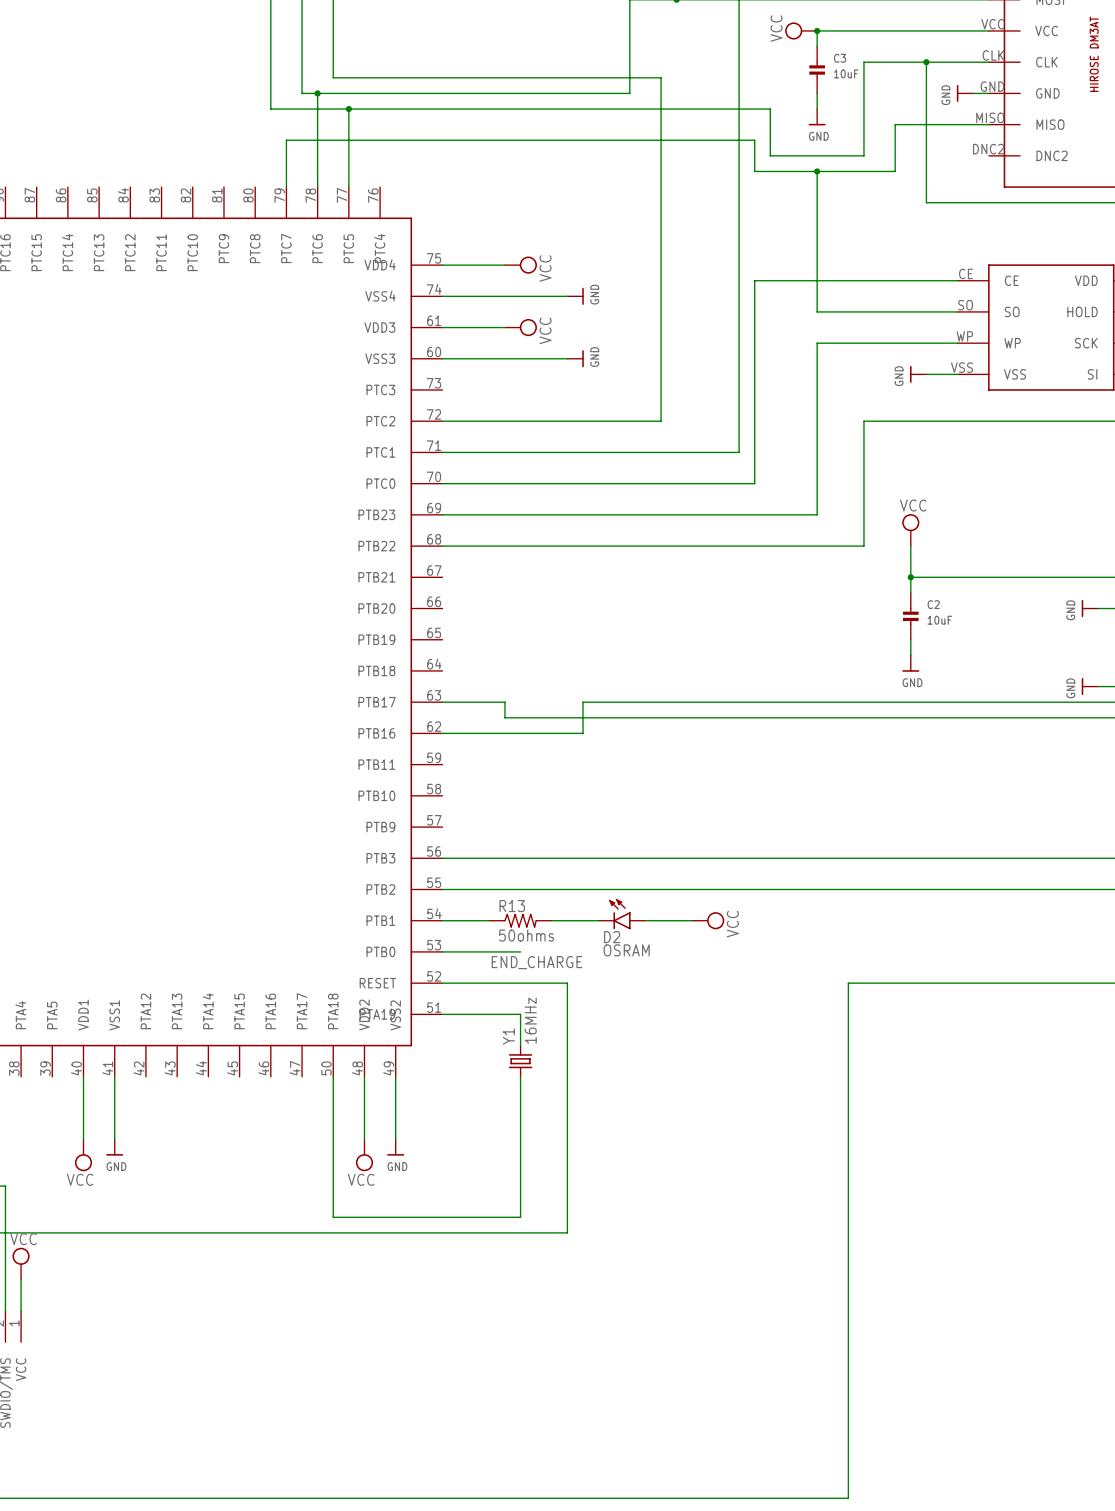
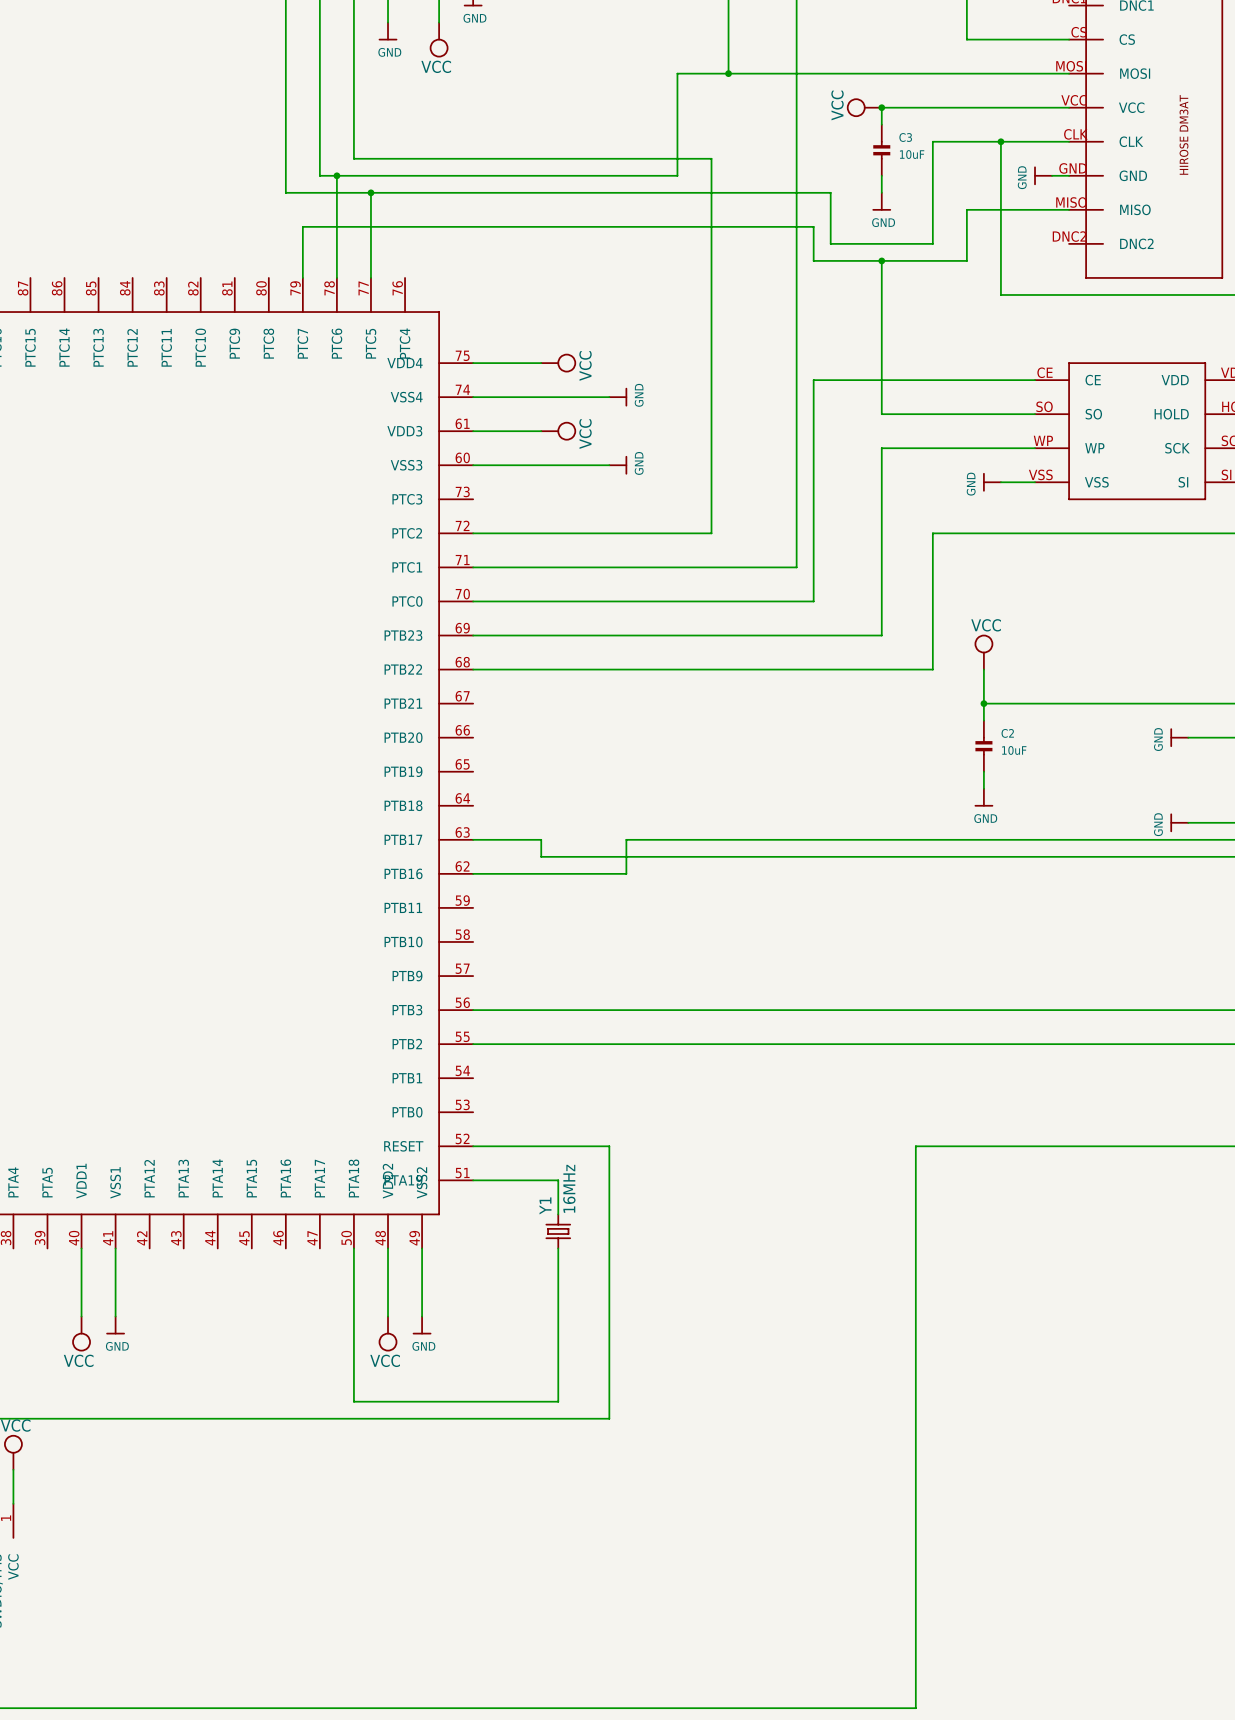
D2: OSRAM (622, 914) -> none
wire: (442, 920) (489, 920) -> none
R13: 50ohms (520, 920) -> none
wire: (551, 920) (598, 920) -> none
wire: (645, 920) (692, 920) -> none
power symbol: VCC (708, 920) -> none
wire: (442, 951) (520, 951) -> none
label: END_CHARGE (536, 962) -> none

